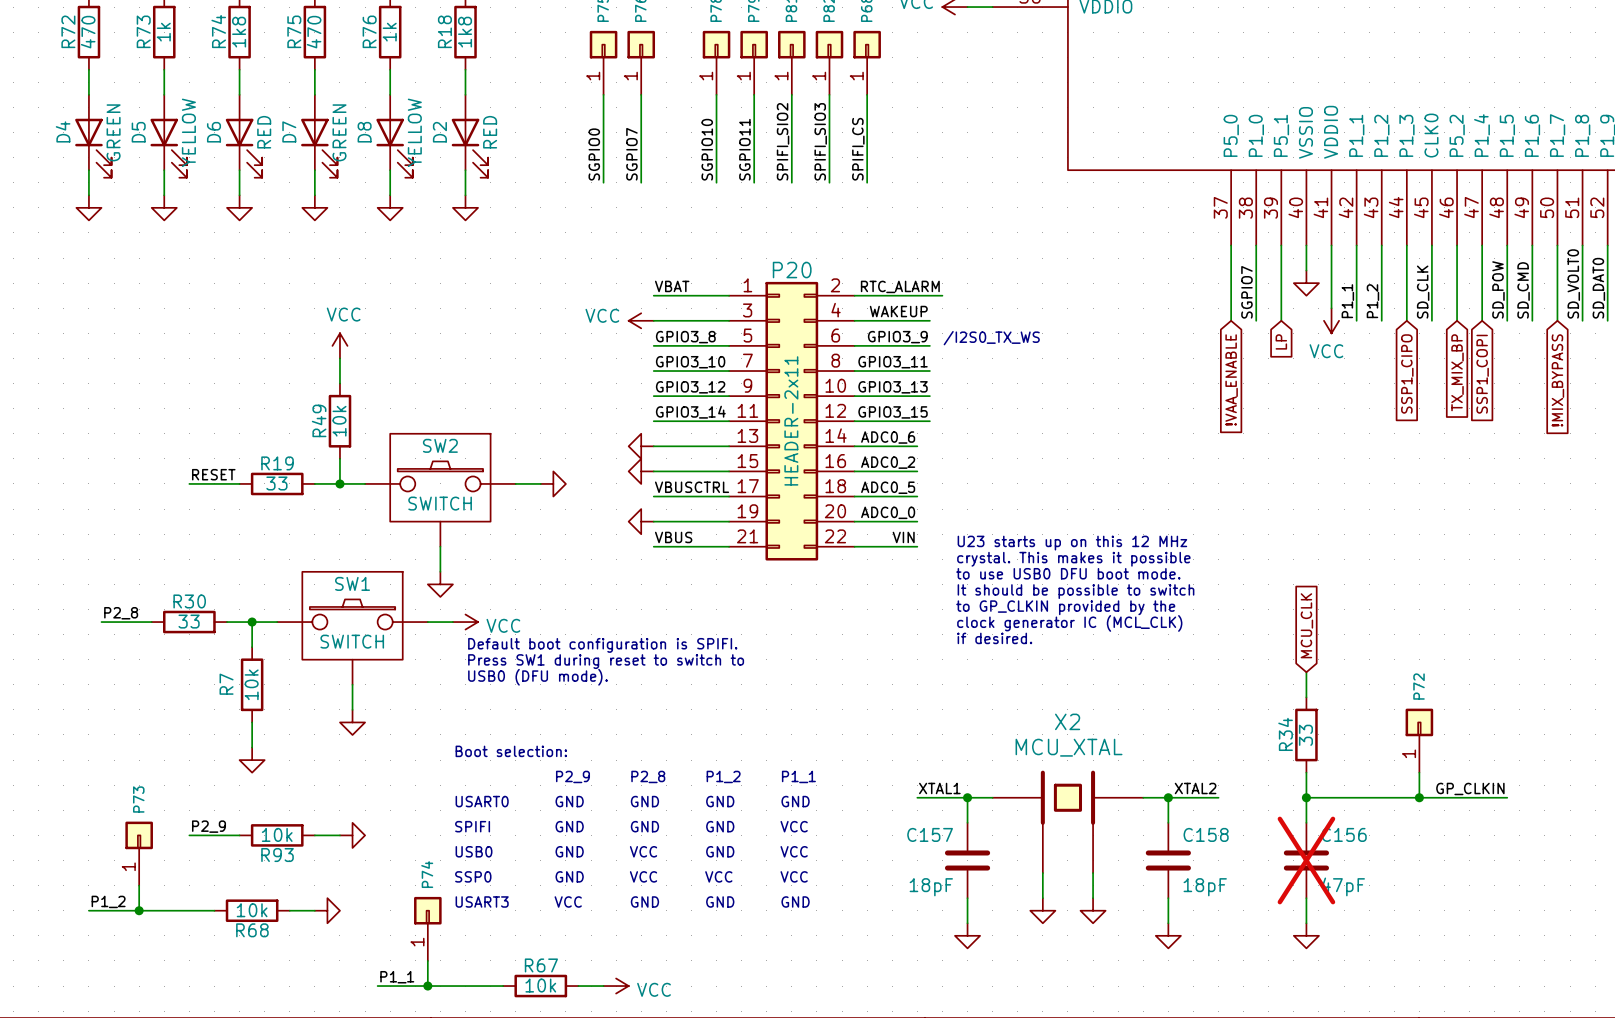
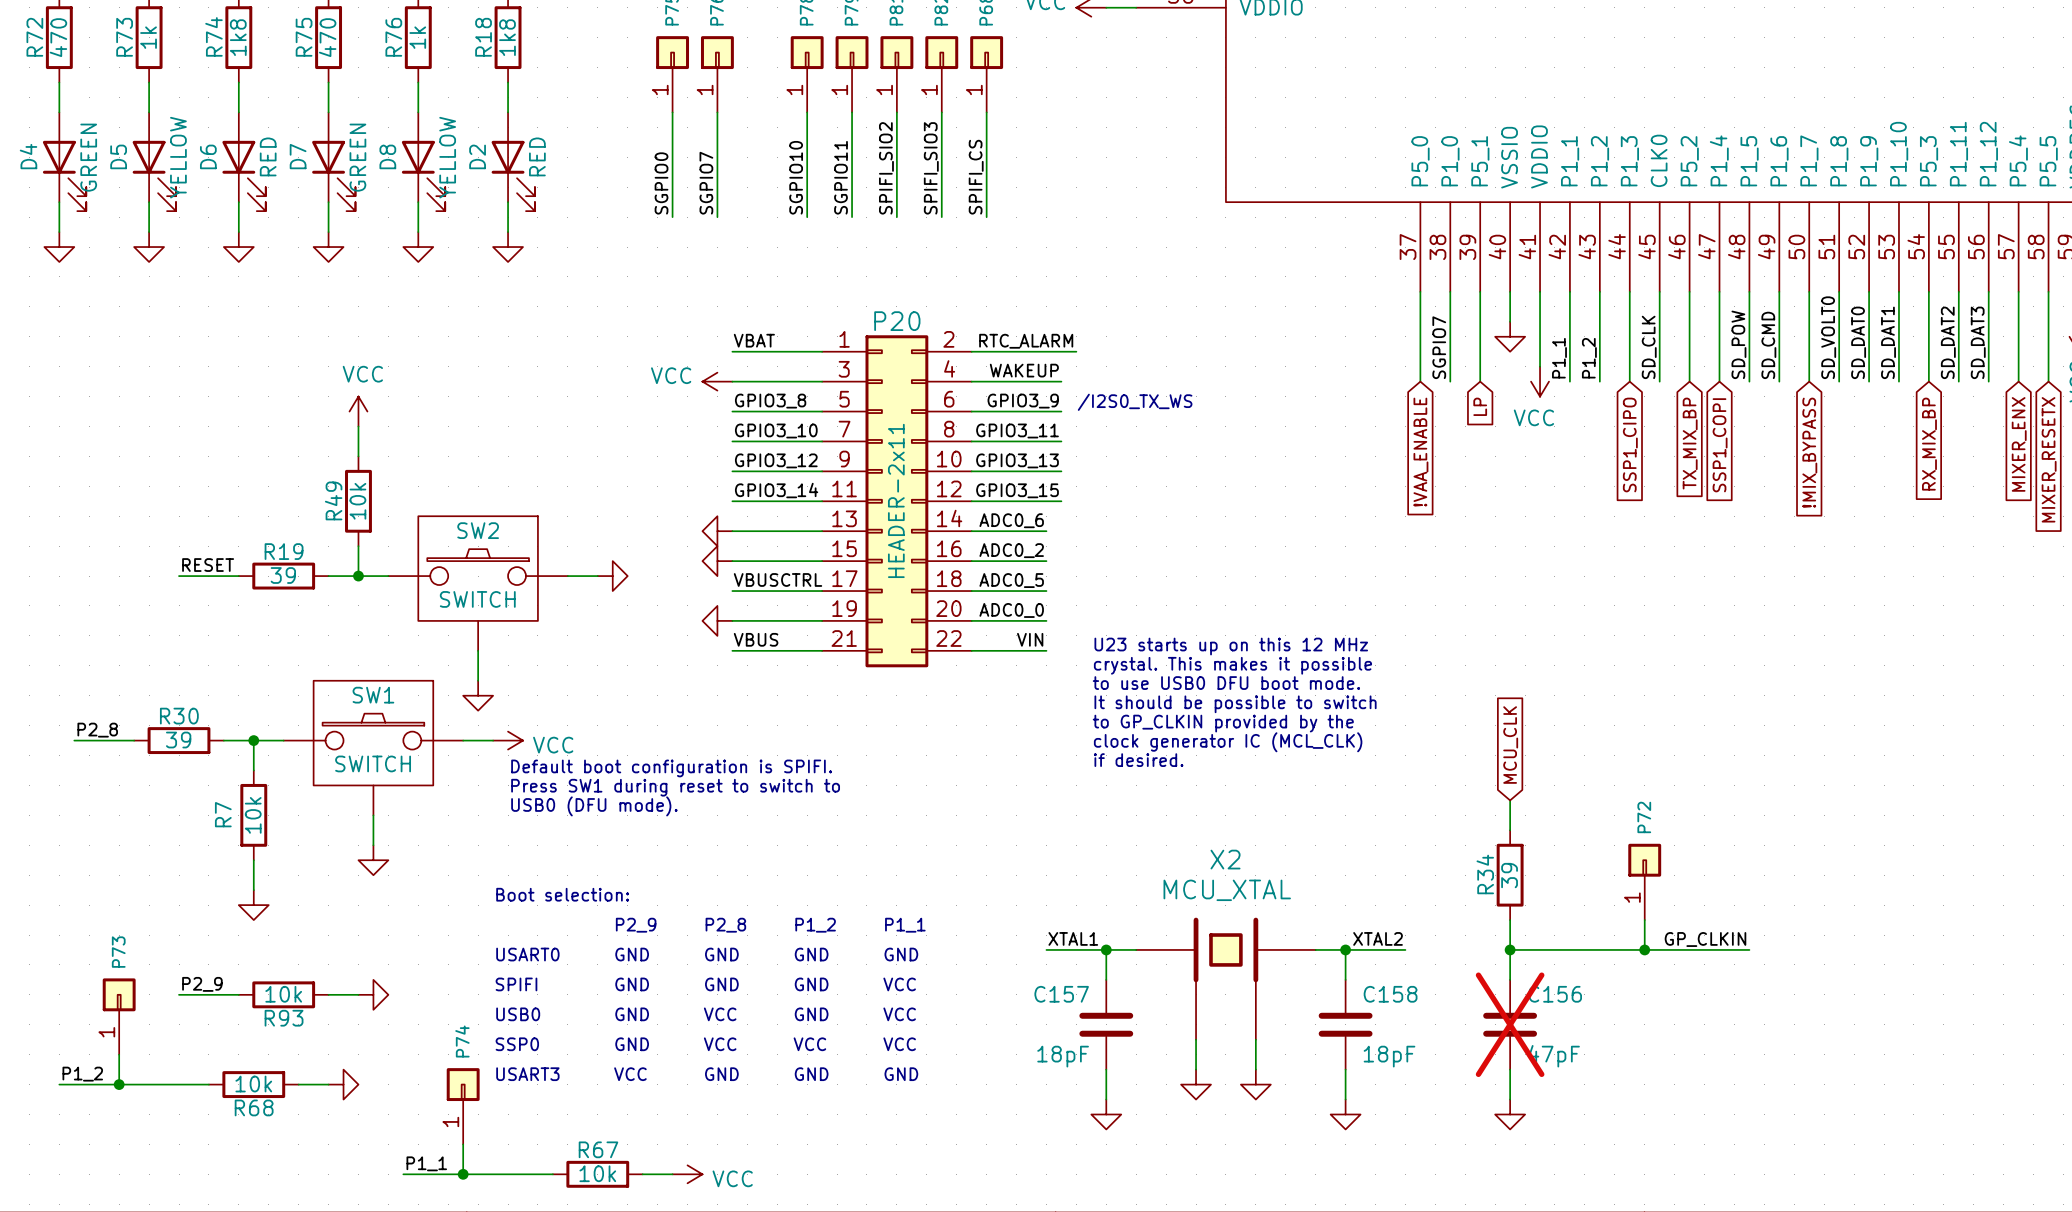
R19 value: 33 (276, 483) -> 39 (283, 575)
R30 value: 33 (189, 621) -> 39 (178, 740)
R34 value: 33 (1305, 735) -> 39 (1509, 875)

